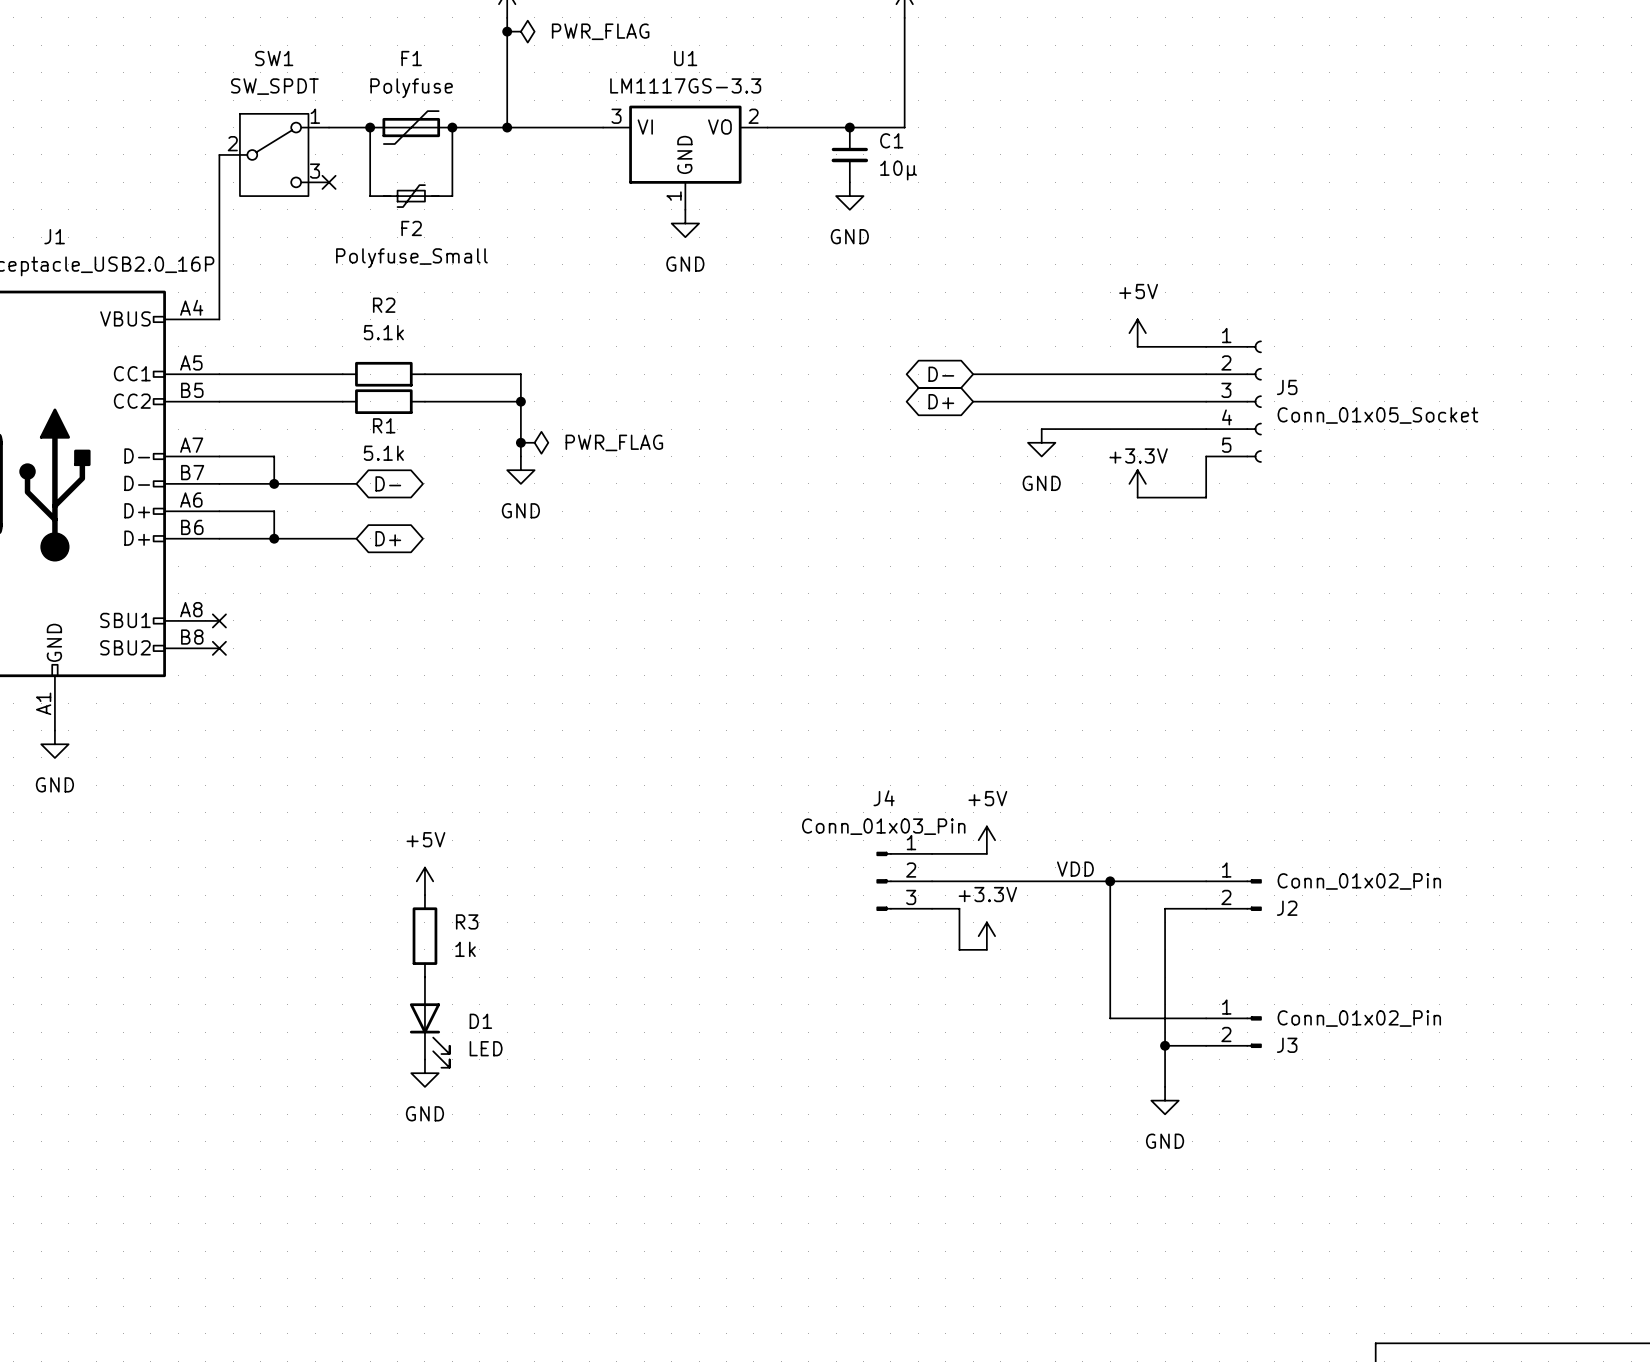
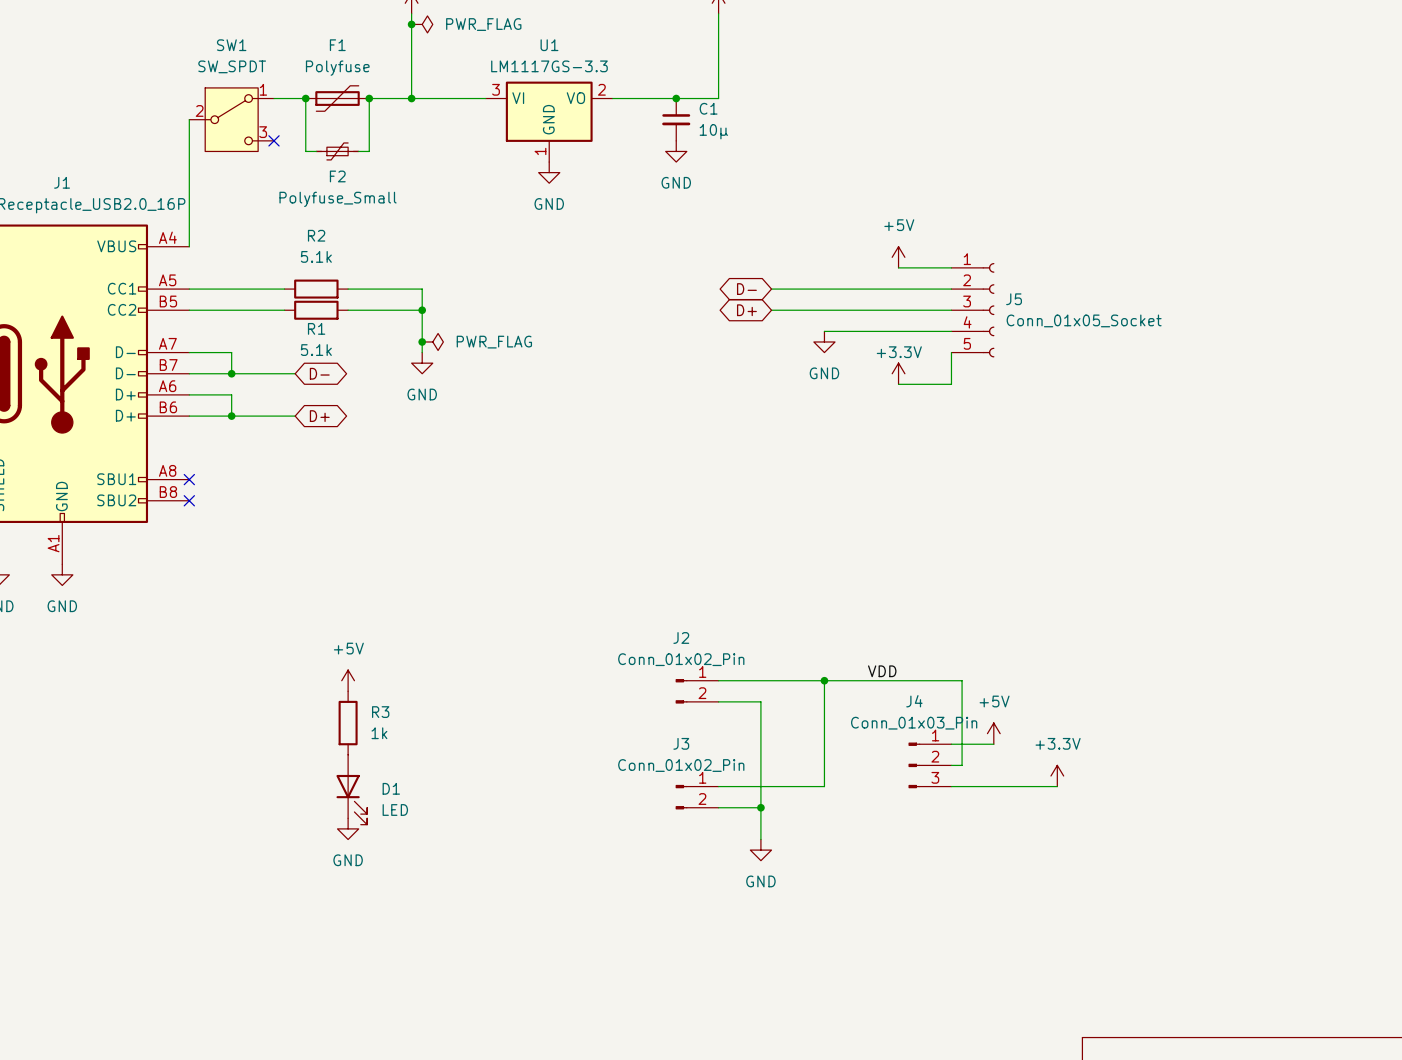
power symbol: +5V (986, 840) -> none
wire: (932, 853) (986, 853) -> (718, 807) (760, 807)
label position: VDD (1075, 869) -> VDD (882, 671)
J4 position: (904, 881) -> (929, 765)
wire: none -> (824, 680) (824, 786) (718, 786)
junction: none -> (824, 680)
wire: (1110, 881) (1110, 1018) (1206, 1018) -> (1057, 786) (951, 786)
junction: (1110, 881) -> none
wire: none -> (951, 680) (962, 680) (962, 765) (951, 765)
J2 value position: Conn_01x02_Pin (1359, 881) -> Conn_01x02_Pin (681, 659)
J2 position: (1233, 895) -> (697, 691)
J2 flip: as is (1254, 895) -> left-right (681, 691)
wire: (1206, 908) (1165, 908) (1165, 1086) -> none
J2 name position: J2 (1287, 908) -> J2 (681, 637)
power symbol: +3.3V (986, 936) -> none
wire: (959, 949) (986, 949) -> (760, 733) (760, 839)
power symbol: none -> +5V (993, 733)
wire: none -> (951, 744) (993, 744)
power symbol: none -> +3.3V (1057, 775)
J3 value position: Conn_01x02_Pin (1359, 1018) -> Conn_01x02_Pin (681, 765)
J3 position: (1233, 1032) -> (697, 797)
J3 flip: as is (1254, 1032) -> left-right (681, 797)
junction: none -> (760, 807)
wire: (1165, 1045) (1206, 1045) -> none
junction: (1165, 1045) -> none
J3 name position: J3 (1287, 1045) -> J3 (681, 743)
power symbol position: GND (1165, 1100) -> GND (760, 850)

